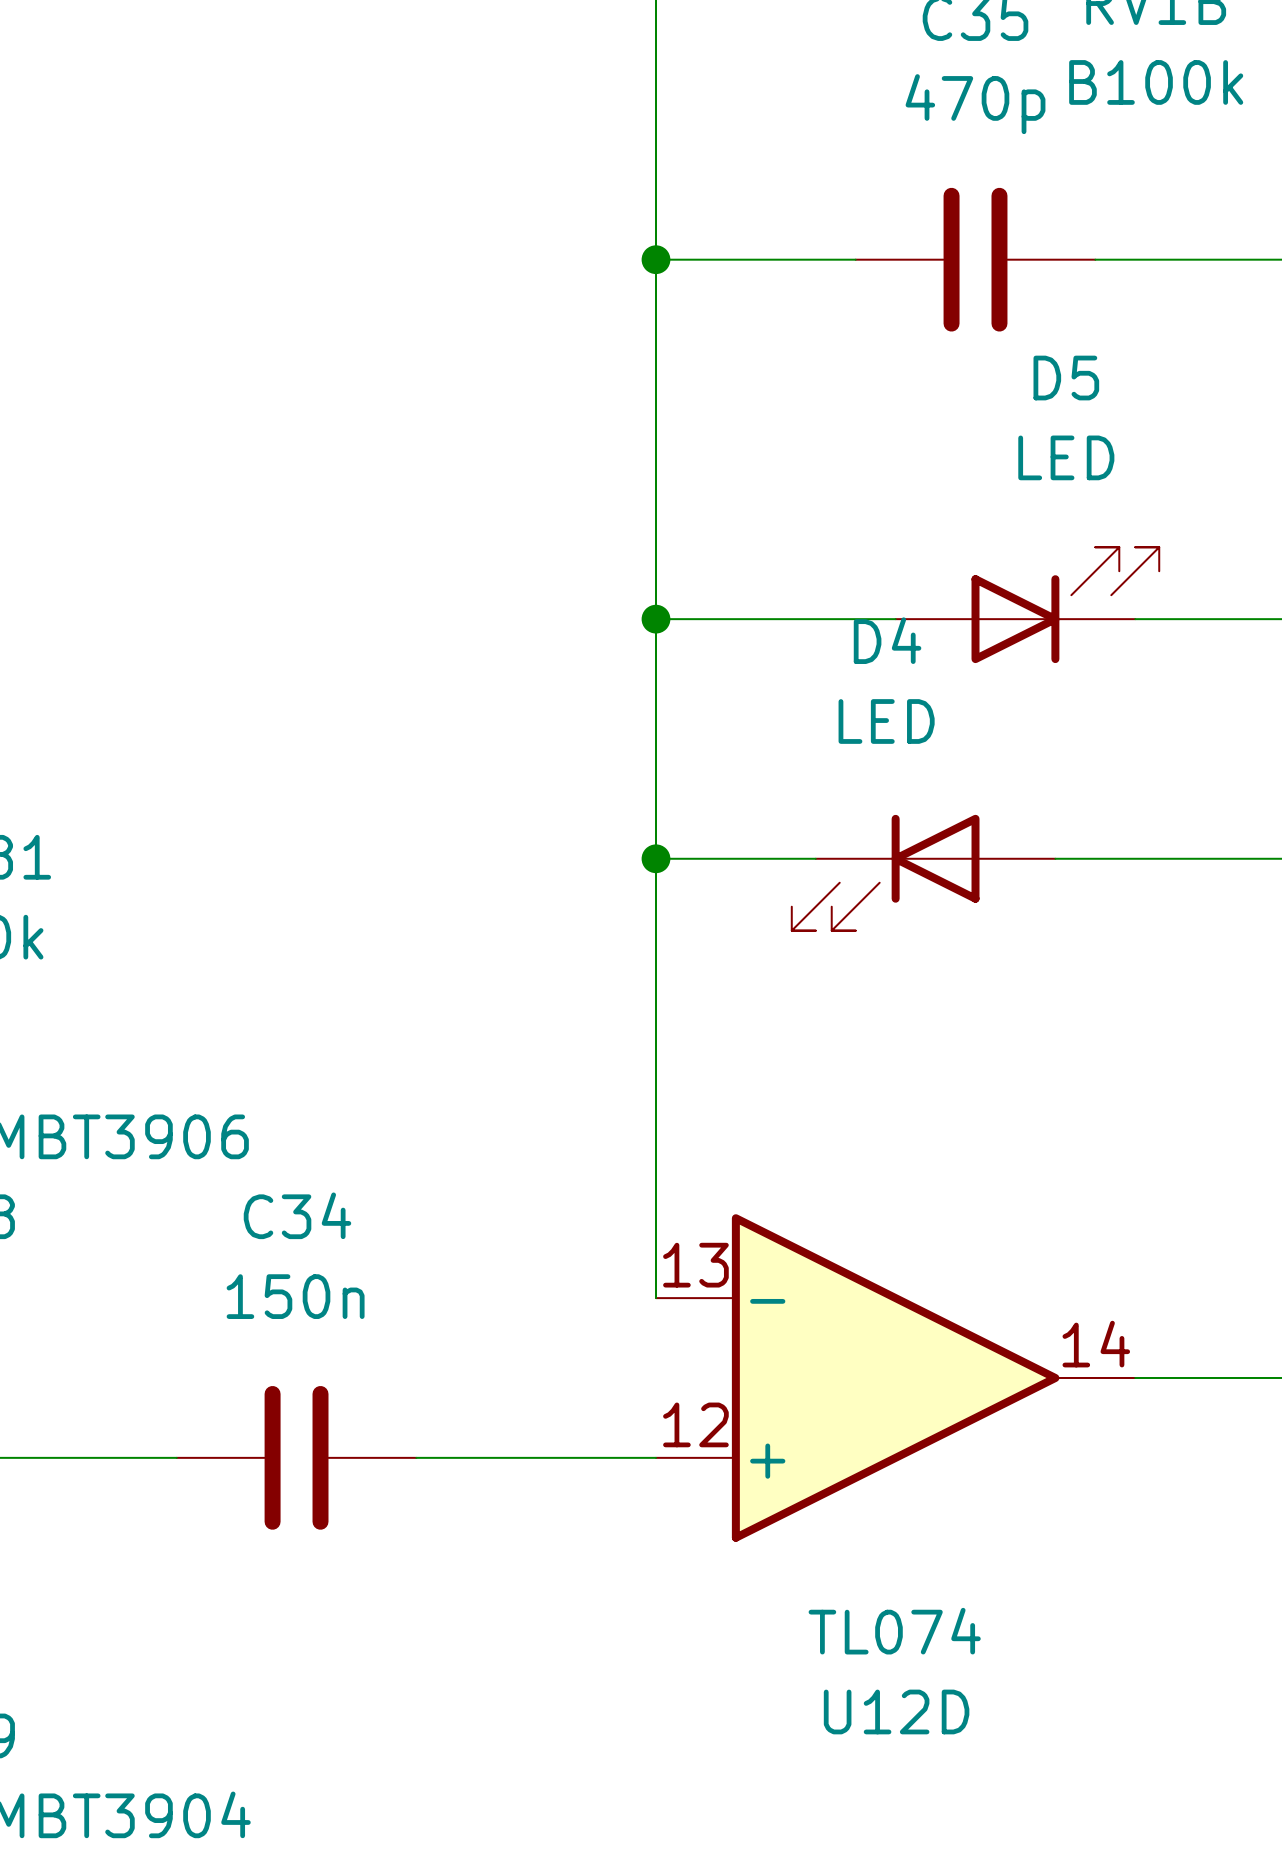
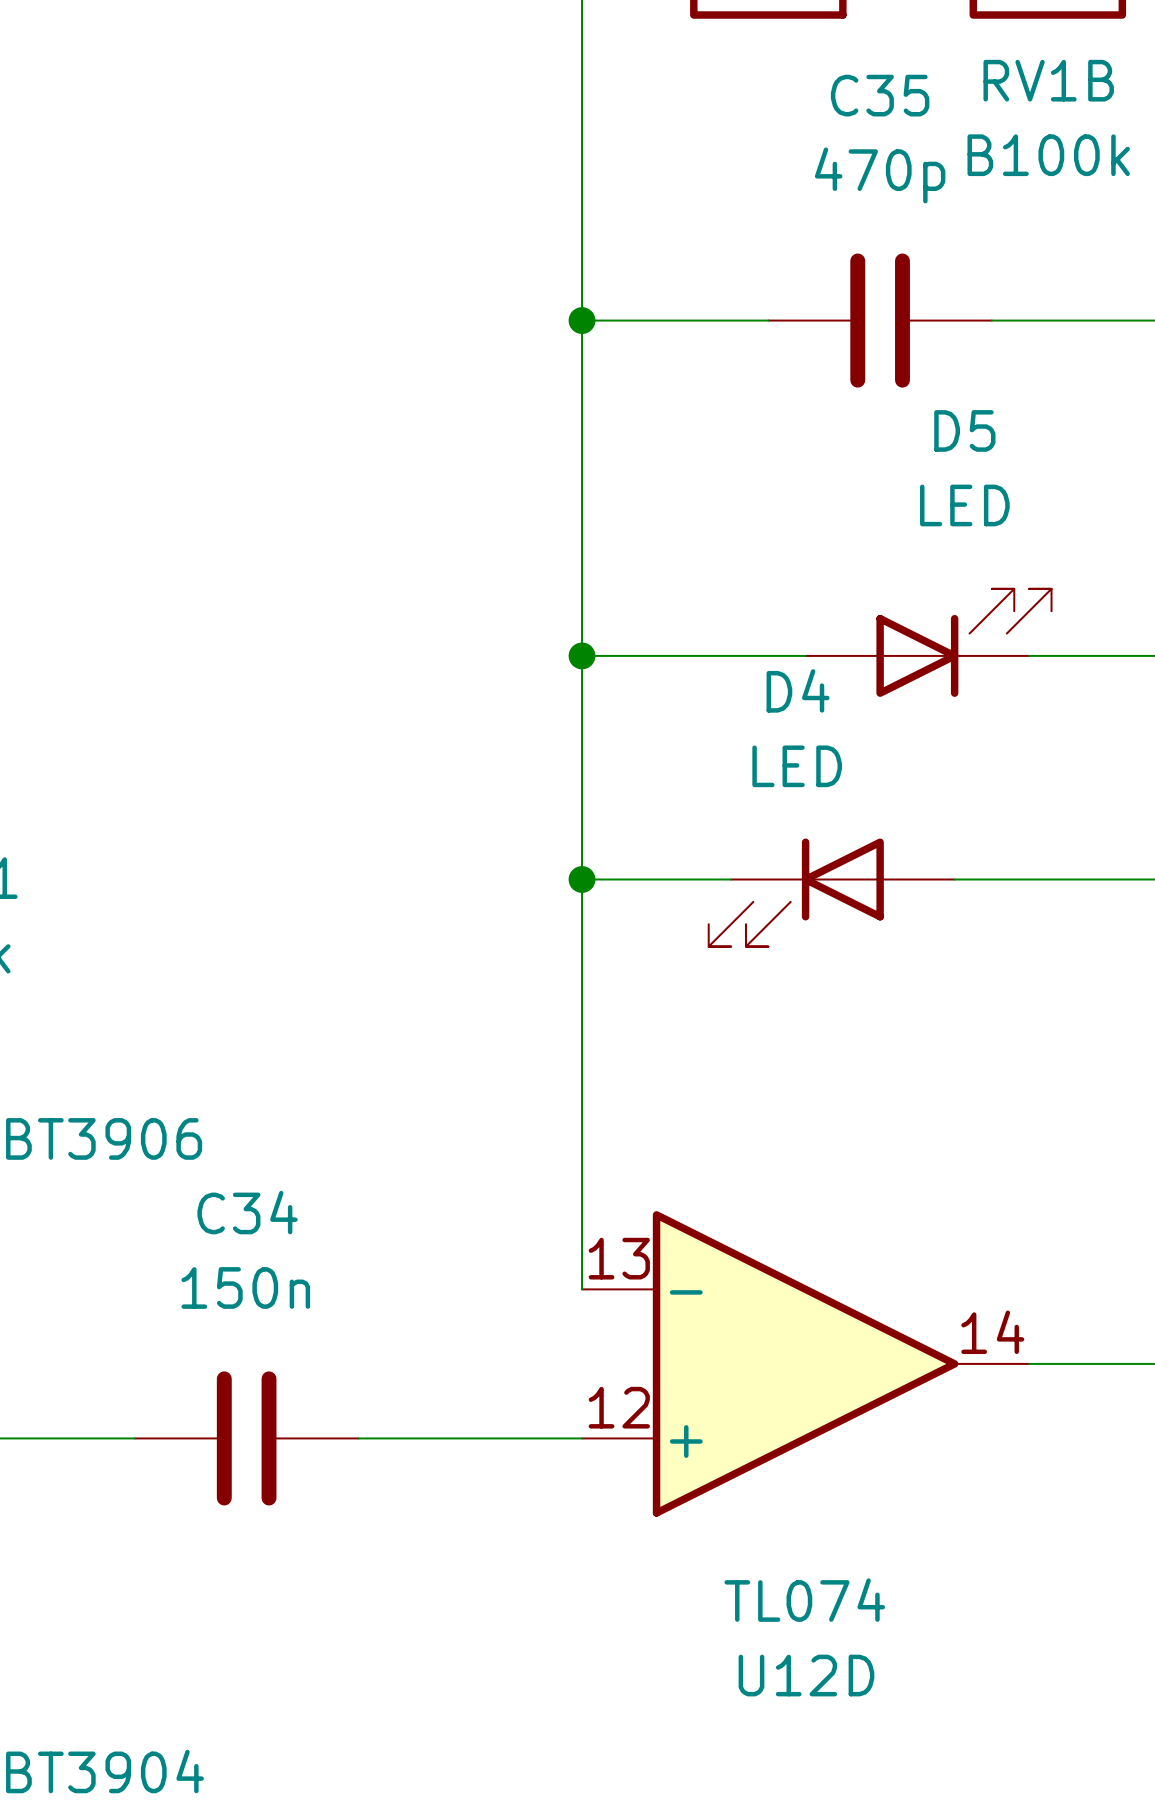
D4 name position: D4 (887, 640) -> D4 (798, 690)
D4 value position: LED (886, 721) -> LED (797, 766)

